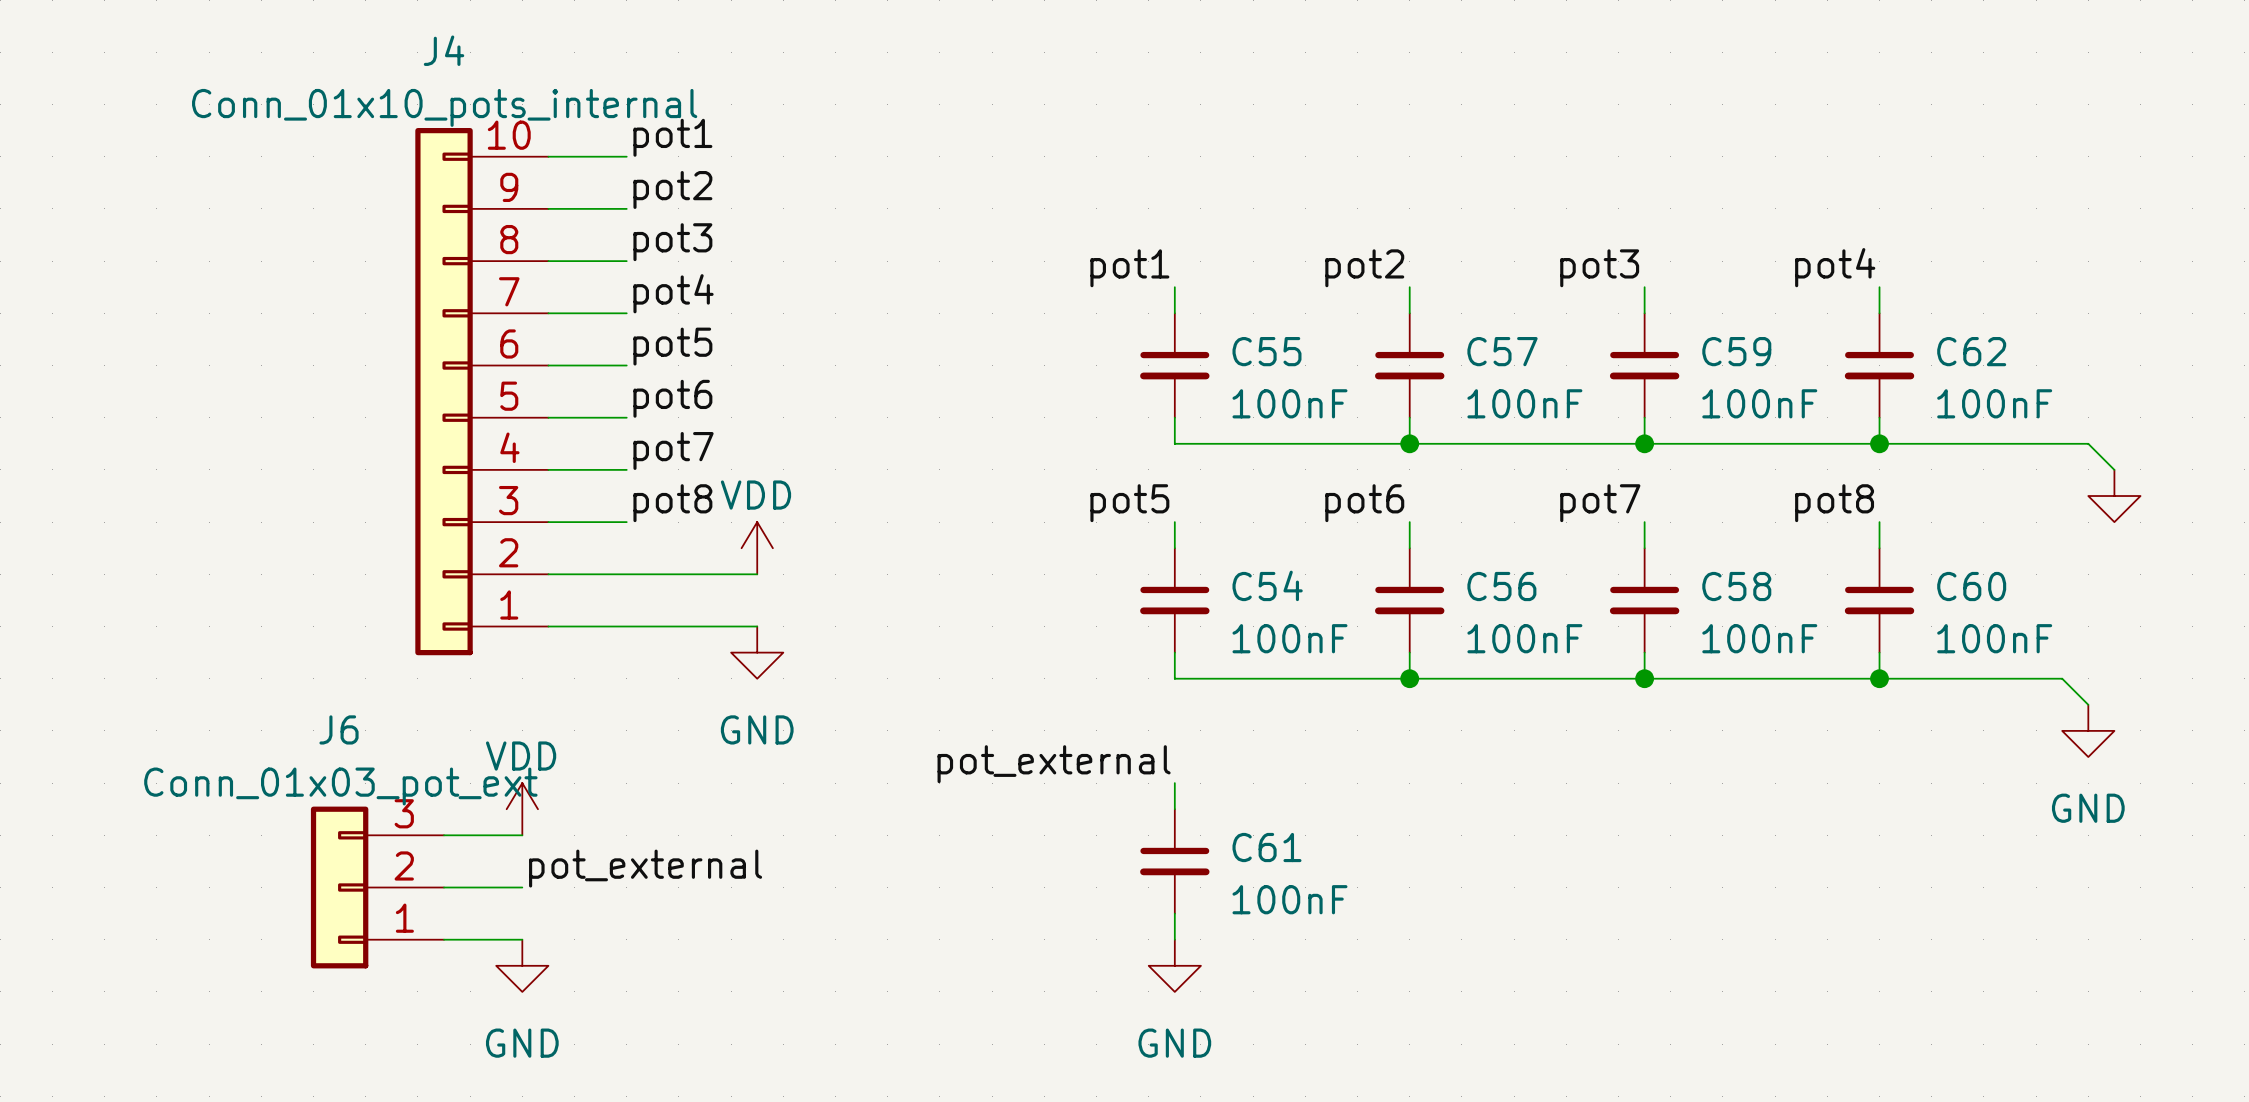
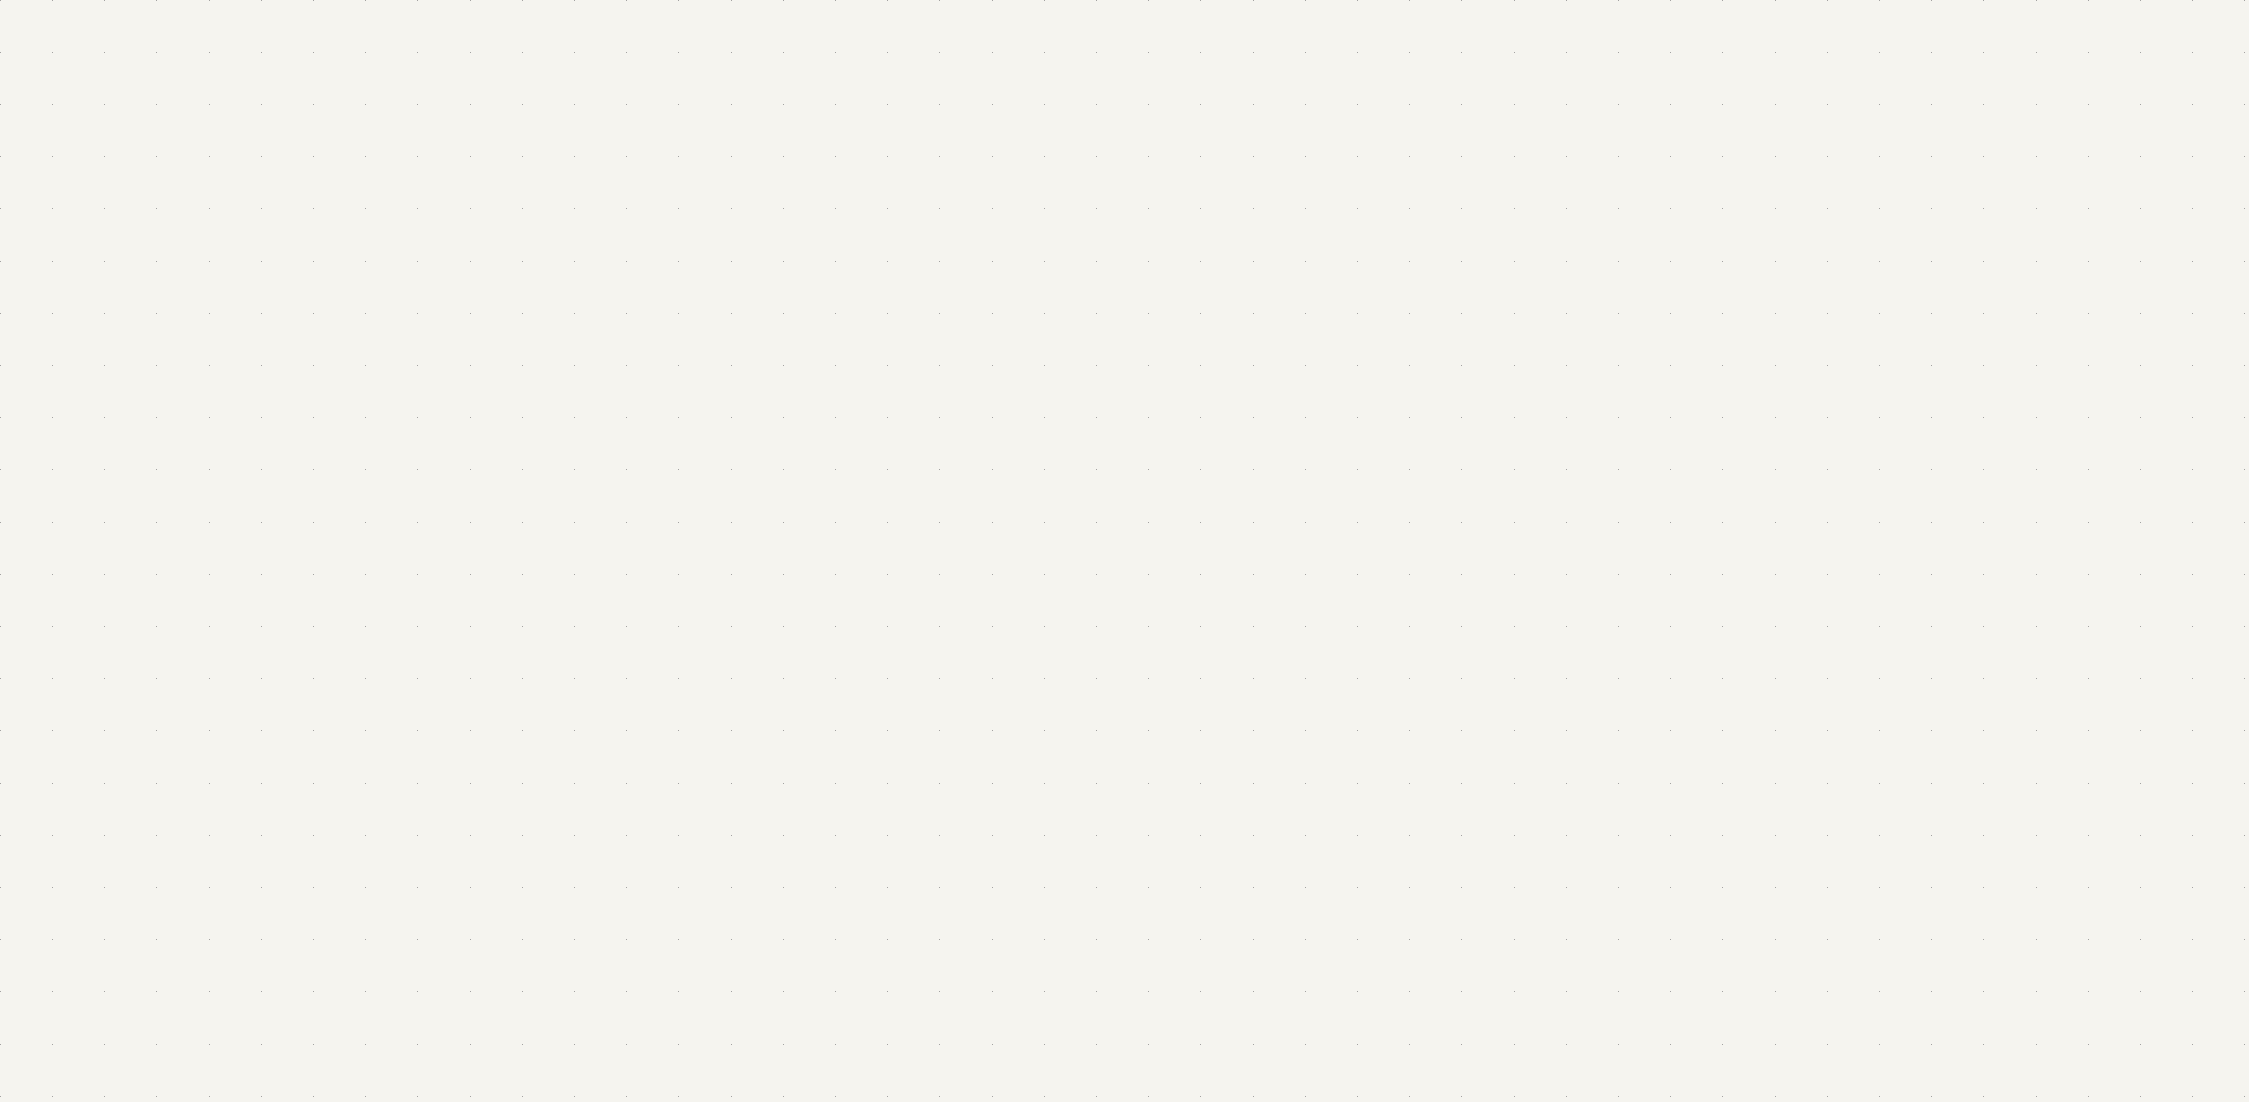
label: pot1 (672, 137) -> none
wire: (548, 156) (626, 156) -> none
label: pot2 (672, 189) -> none
wire: (548, 208) (626, 208) -> none
label: pot3 (672, 242) -> none
wire: (548, 261) (626, 261) -> none
label: pot4 (1835, 267) -> none
label: pot1 (1129, 268) -> none
label: pot2 (1364, 268) -> none
label: pot3 (1599, 268) -> none
wire: (1174, 287) (1174, 313) -> none
wire: (1409, 287) (1409, 313) -> none
wire: (1644, 287) (1644, 313) -> none
wire: (1879, 287) (1879, 313) -> none
label: pot4 (673, 293) -> none
wire: (548, 313) (626, 313) -> none
label: pot5 (672, 346) -> none
wire: (548, 365) (626, 365) -> none
C55: 100nF (1174, 365) -> none
C57: 100nF (1409, 365) -> none
C59: 100nF (1644, 365) -> none
C62: 100nF (1879, 365) -> none
J4: Conn_01x10_pots_internal (481, 391) -> none
label: pot6 (672, 398) -> none
wire: (548, 417) (626, 417) -> none
wire: (1174, 417) (1174, 443) (2088, 443) (2114, 469) -> none
wire: (1409, 417) (1409, 443) -> none
wire: (1644, 417) (1644, 443) -> none
wire: (1879, 417) (1879, 443) -> none
junction: (1409, 443) -> none
junction: (1644, 443) -> none
junction: (1879, 443) -> none
label: pot7 (673, 450) -> none
wire: (548, 469) (626, 469) -> none
power symbol: (2114, 496) -> none
label: pot8 (672, 503) -> none
label: pot5 (1129, 503) -> none
label: pot6 (1364, 503) -> none
label: pot7 (1600, 503) -> none
label: pot8 (1834, 503) -> none
wire: (548, 522) (626, 522) -> none
wire: (1174, 522) (1174, 548) -> none
wire: (1409, 522) (1409, 548) -> none
wire: (1644, 522) (1644, 548) -> none
wire: (1879, 522) (1879, 548) -> none
power symbol: VDD (757, 548) -> none
wire: (548, 574) (757, 574) -> none
C54: 100nF (1174, 600) -> none
C56: 100nF (1409, 600) -> none
C58: 100nF (1644, 600) -> none
C60: 100nF (1879, 600) -> none
wire: (548, 626) (757, 626) -> none
power symbol: GND (757, 652) -> none
wire: (1174, 652) (1174, 678) (2062, 678) (2088, 704) -> none
wire: (1409, 652) (1409, 678) -> none
wire: (1644, 652) (1644, 678) -> none
wire: (1879, 652) (1879, 678) -> none
junction: (1409, 678) -> none
junction: (1644, 678) -> none
junction: (1879, 678) -> none
power symbol: GND (2088, 730) -> none
label: pot_external (1054, 764) -> none
wire: (1174, 783) (1174, 809) -> none
power symbol: VDD (522, 809) -> none
wire: (444, 835) (522, 835) -> none
C61: 100nF (1174, 861) -> none
label: pot_external (645, 868) -> none
J6: Conn_01x03_pot_ext (377, 887) -> none
wire: (444, 887) (522, 887) -> none
wire: (1174, 913) (1174, 939) -> none
wire: (444, 939) (522, 939) -> none
power symbol: GND (522, 965) -> none
power symbol: GND (1174, 965) -> none

